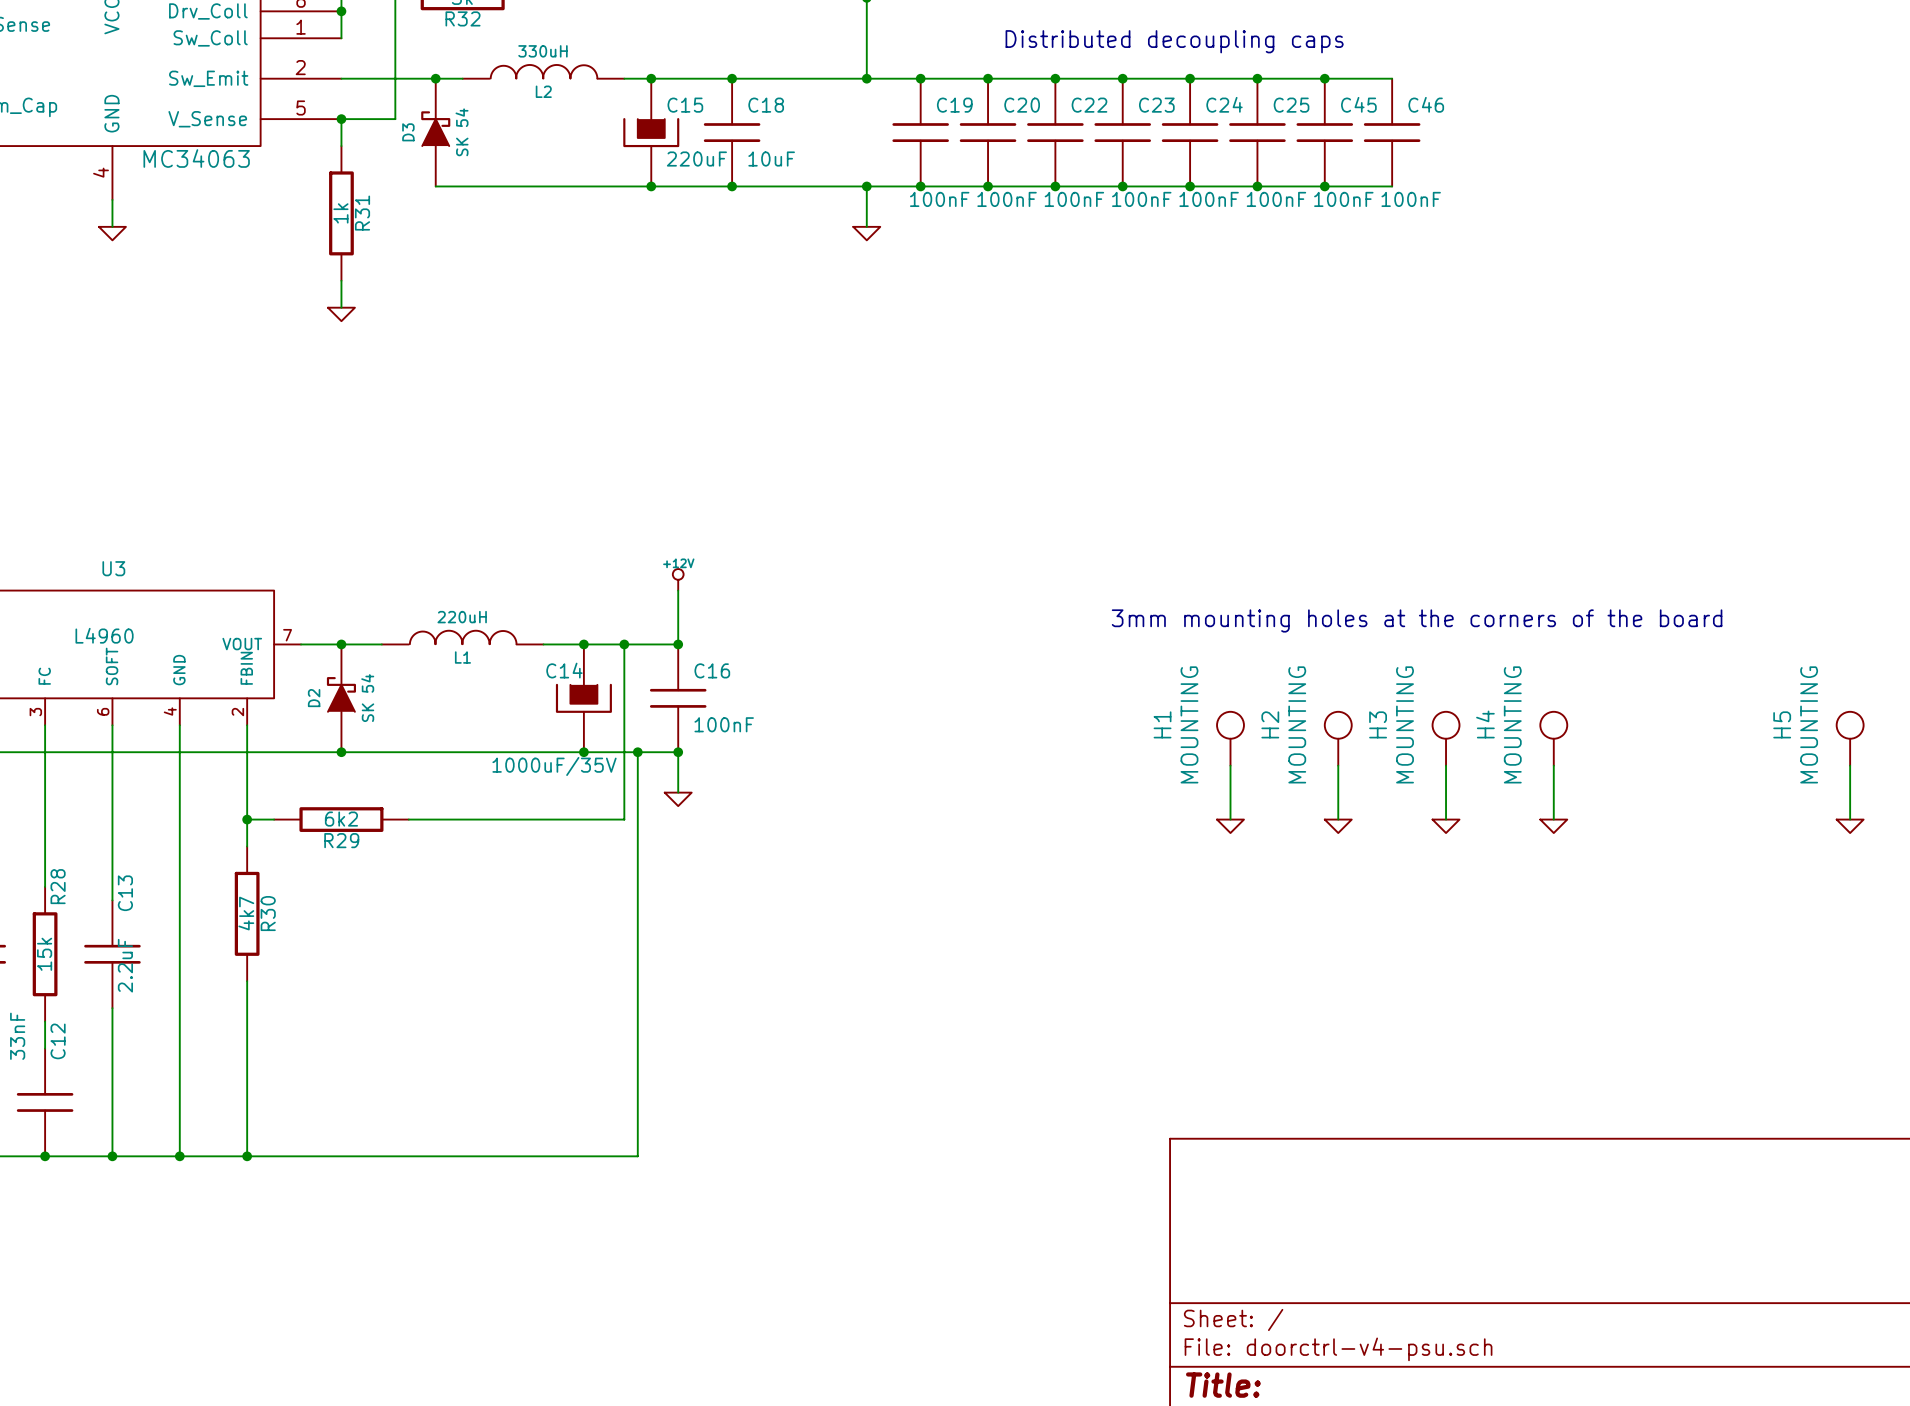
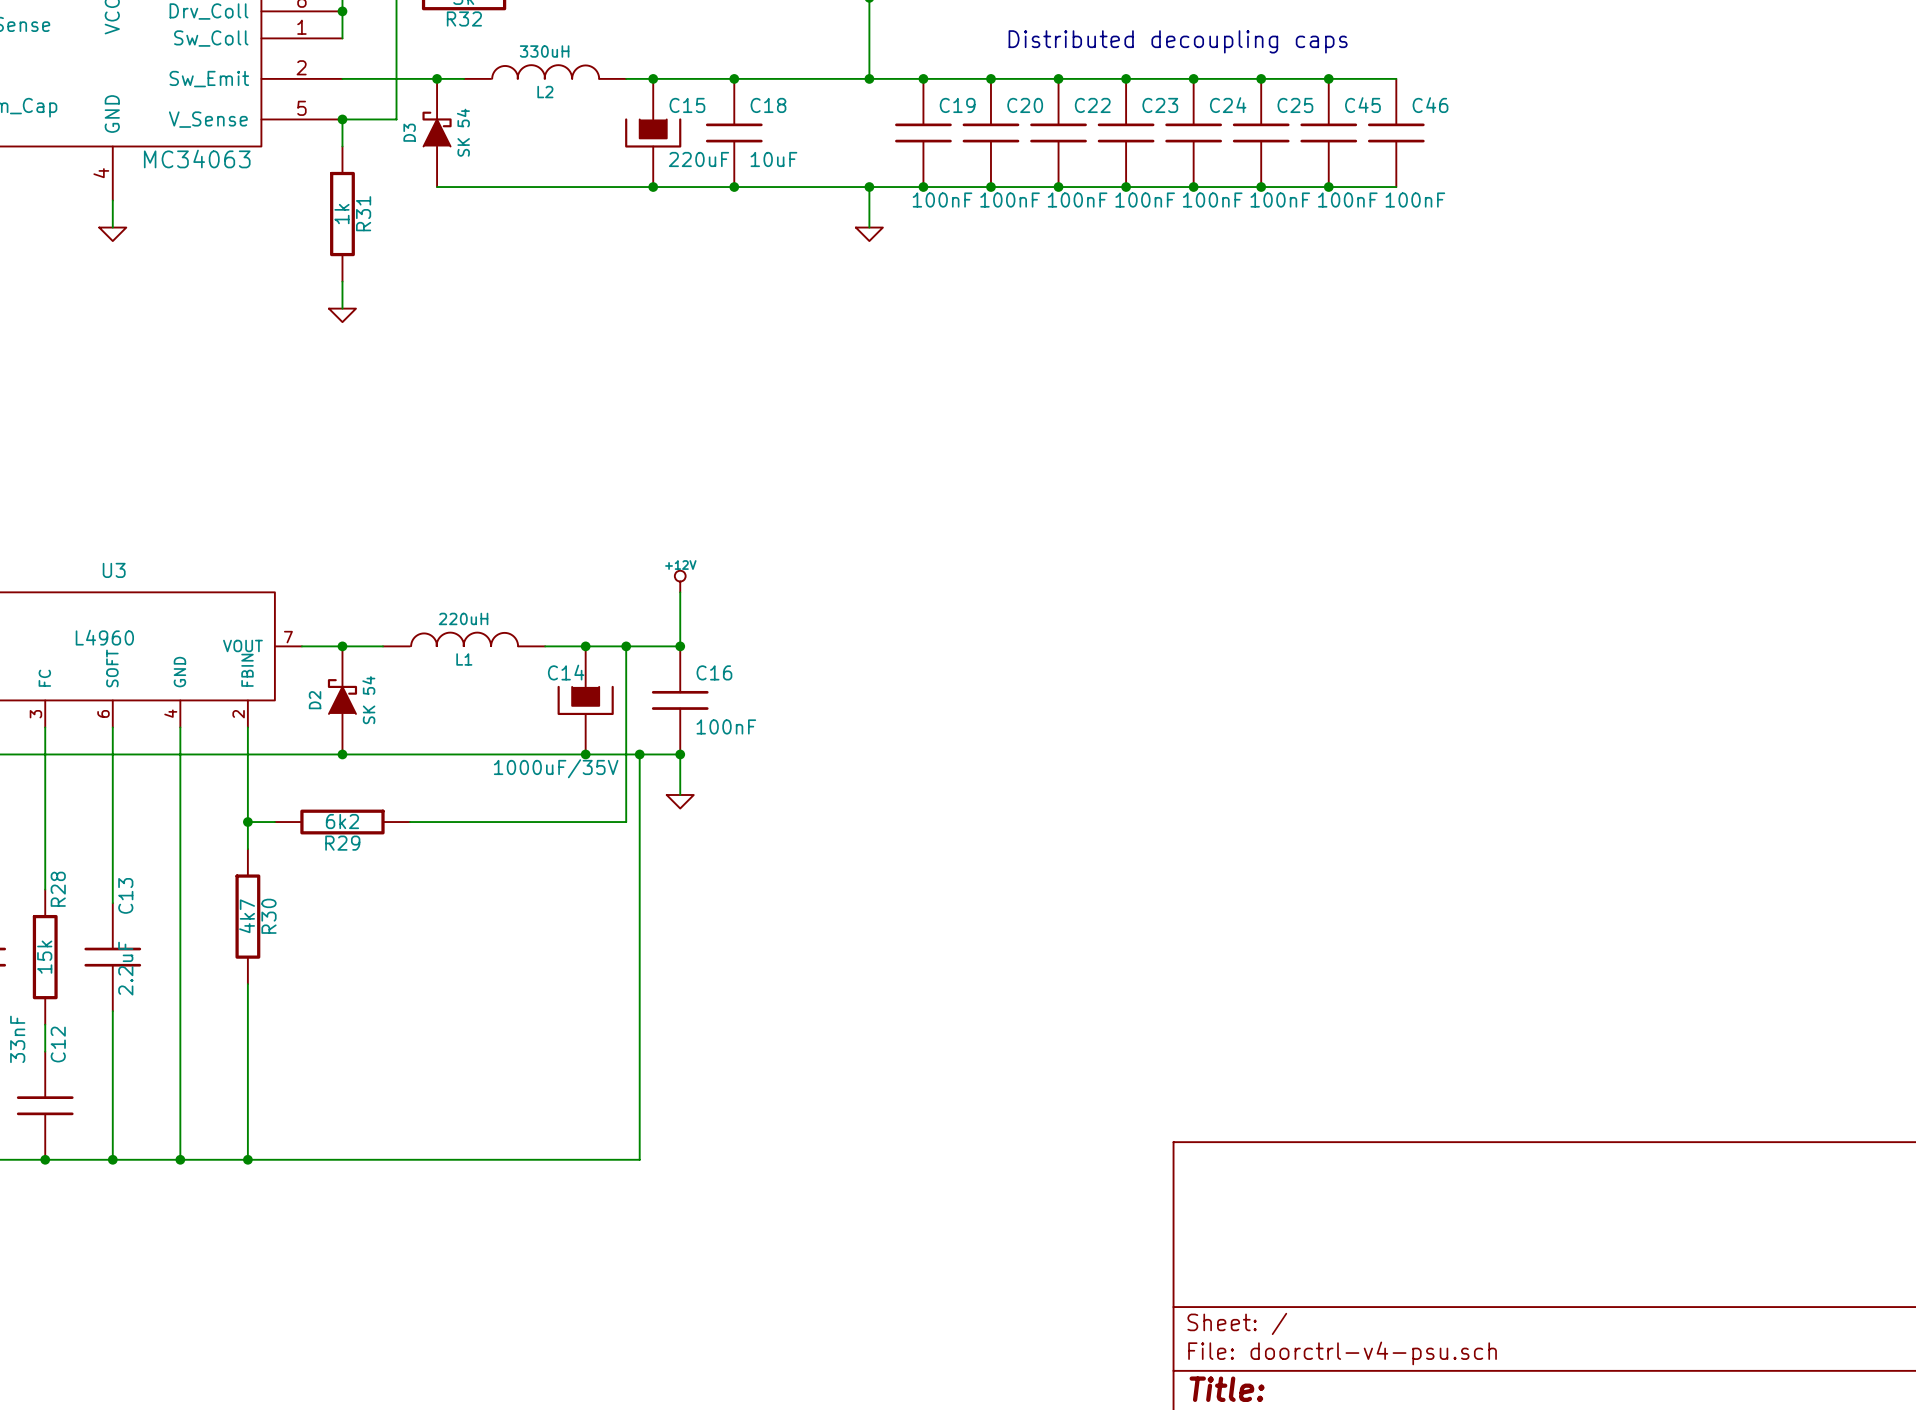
text: 3mm mounting holes at the corners of the board (1417, 620) -> none
H1: MOUNTING (1230, 738) -> none
H2: MOUNTING (1338, 738) -> none
H3: MOUNTING (1446, 738) -> none
H4: MOUNTING (1553, 738) -> none
H5: MOUNTING (1850, 738) -> none
wire: (1230, 765) (1230, 819) -> none
wire: (1338, 765) (1338, 819) -> none
wire: (1446, 765) (1446, 819) -> none
wire: (1553, 765) (1553, 819) -> none
wire: (1850, 765) (1850, 819) -> none
power symbol: (1230, 826) -> none
power symbol: (1338, 826) -> none
power symbol: (1446, 826) -> none
power symbol: (1553, 826) -> none
power symbol: (1850, 826) -> none

